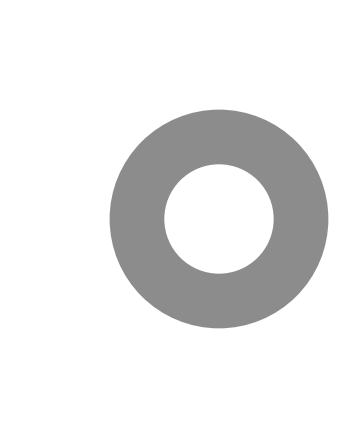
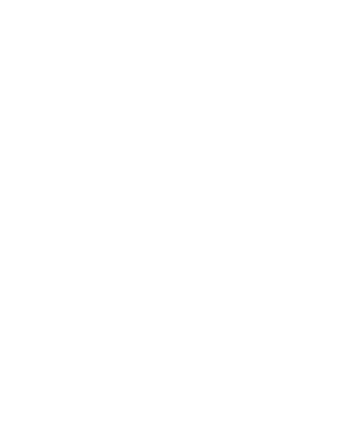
part: (218, 218) -> none

